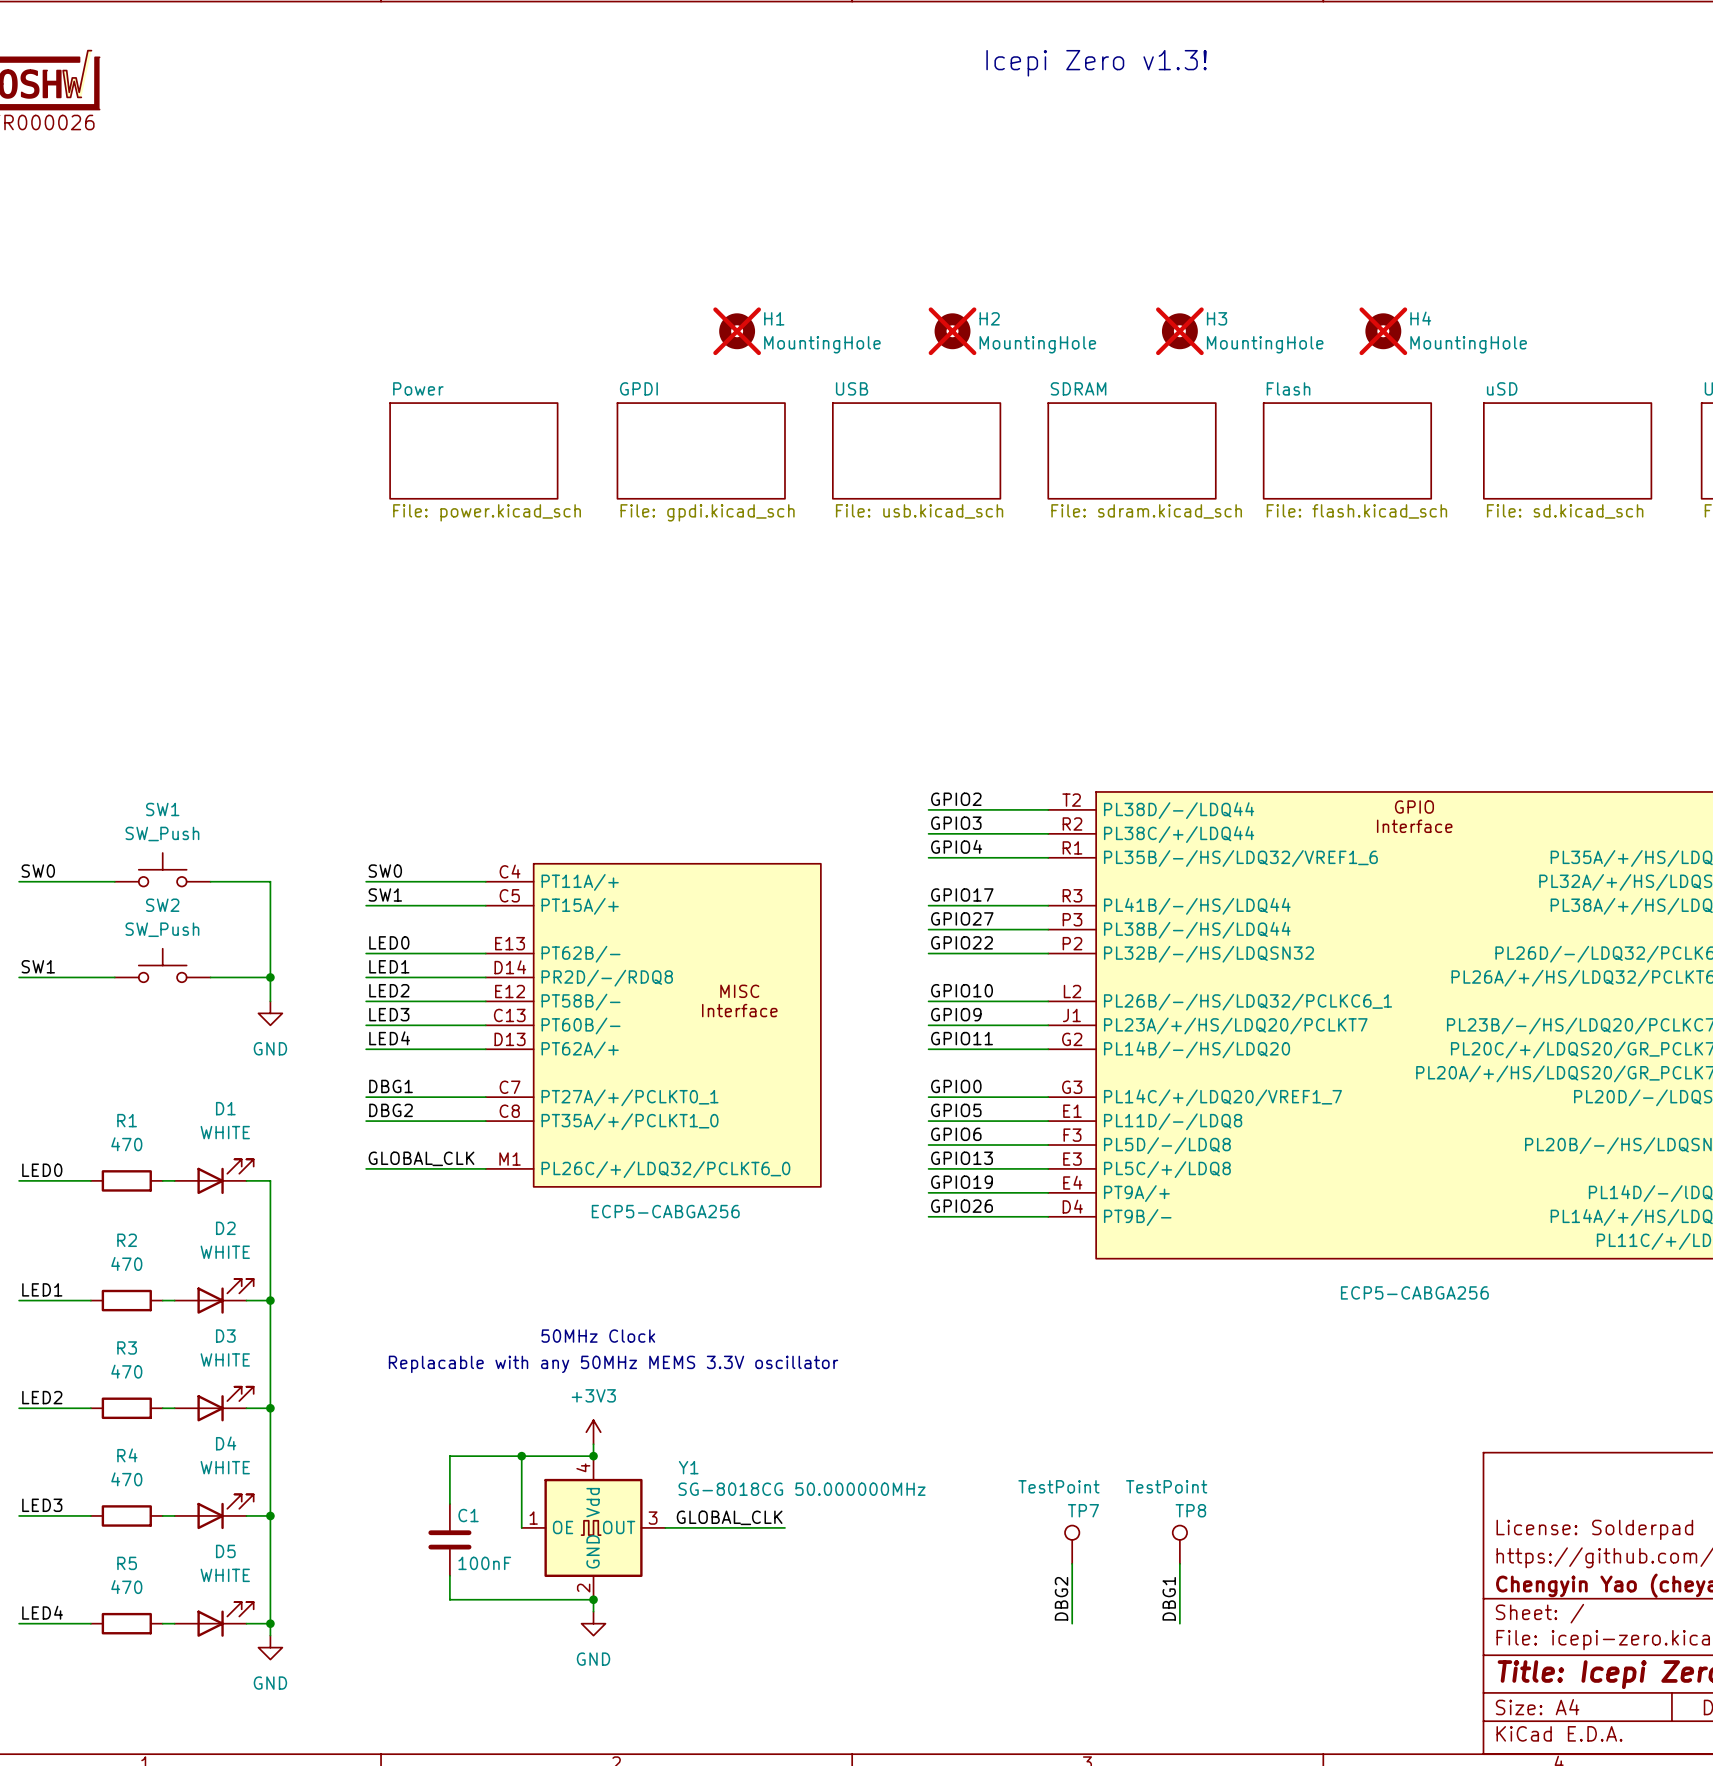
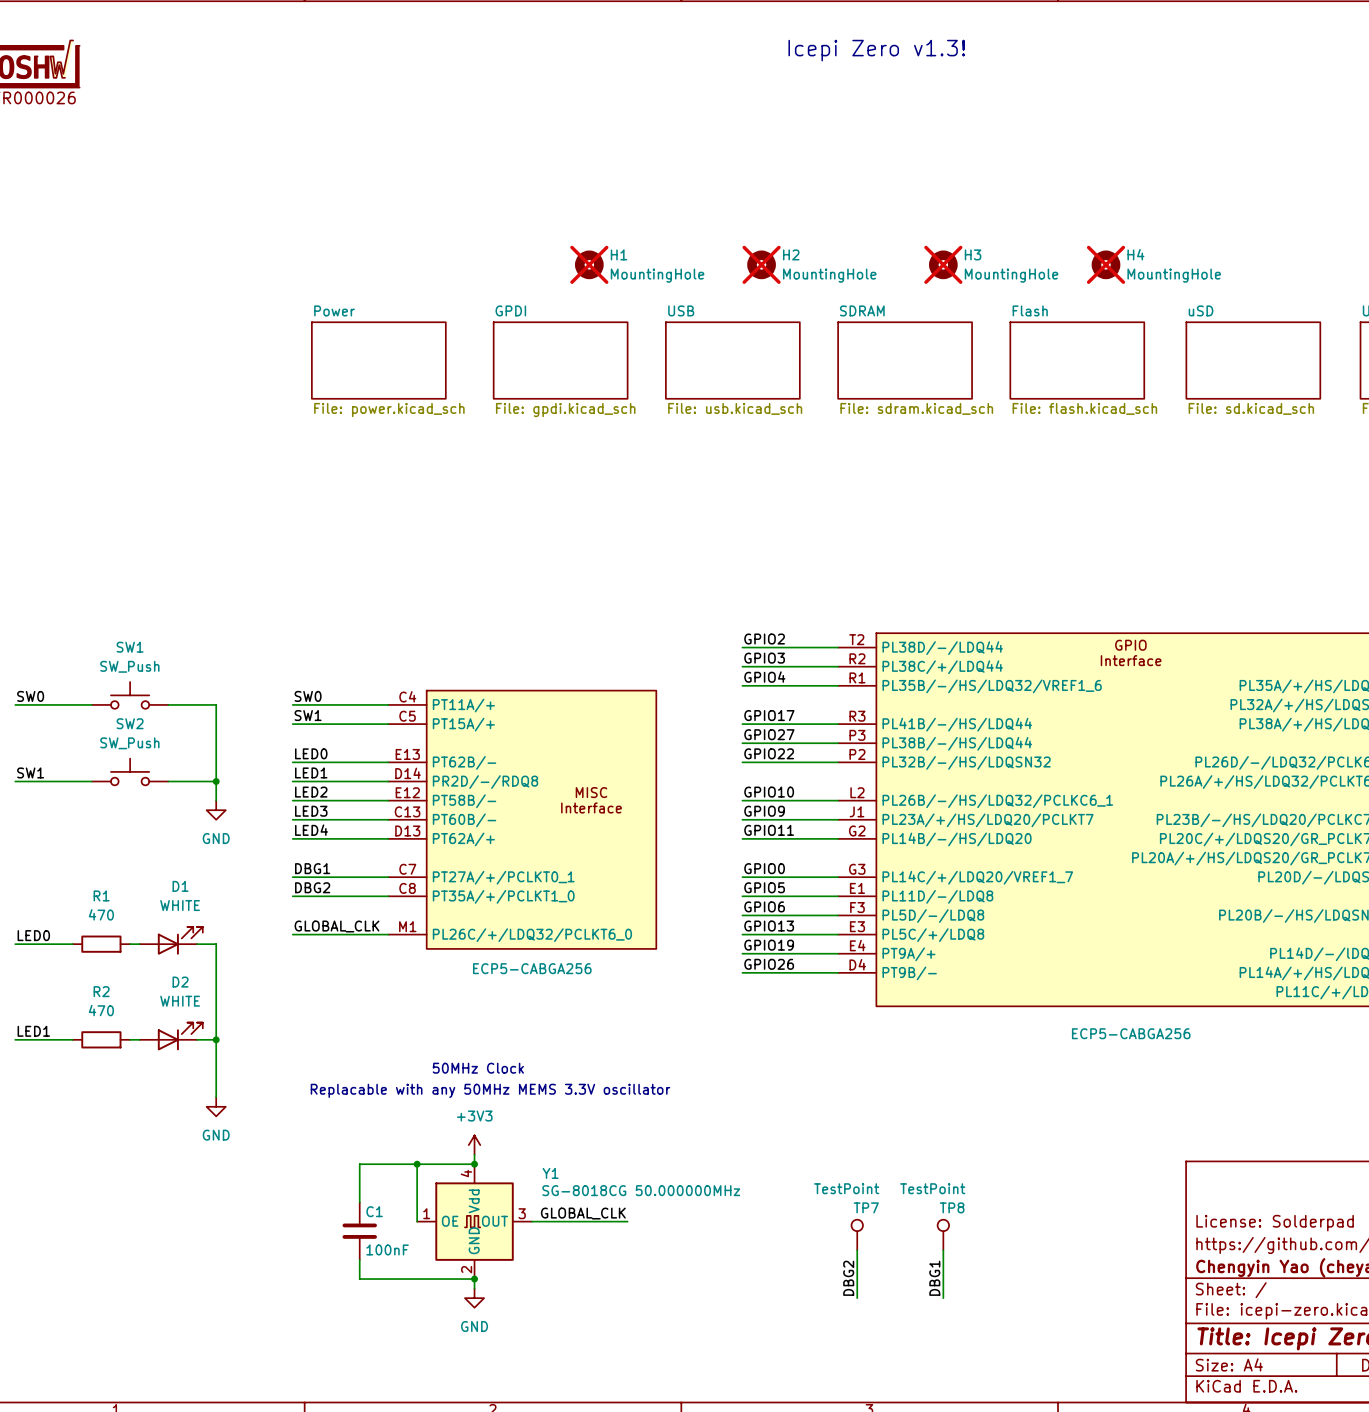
wire: (270, 1372) (270, 1635) -> none
power symbol: none -> GND (216, 1106)
label: LED2 (42, 1397) -> none
D3: WHITE (214, 1404) -> none
wire: (19, 1408) (90, 1408) -> none
R3: 470 (126, 1408) -> none
wire: (162, 1408) (174, 1408) -> none
wire: (246, 1408) (270, 1408) -> none
junction: (270, 1408) -> none
label: LED3 (42, 1505) -> none
D4: WHITE (214, 1511) -> none
wire: (19, 1515) (90, 1515) -> none
R4: 470 (126, 1515) -> none
wire: (162, 1515) (174, 1515) -> none
wire: (246, 1515) (270, 1515) -> none
junction: (270, 1515) -> none
label: LED4 (42, 1612) -> none
D5: WHITE (214, 1619) -> none
wire: (19, 1623) (90, 1623) -> none
R5: 470 (126, 1623) -> none
wire: (162, 1623) (174, 1623) -> none
wire: (246, 1623) (270, 1623) -> none
junction: (270, 1623) -> none
power symbol: GND (270, 1647) -> none

